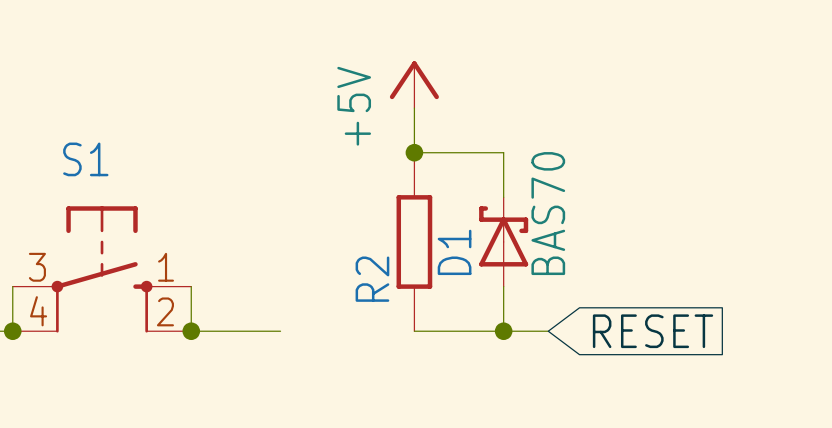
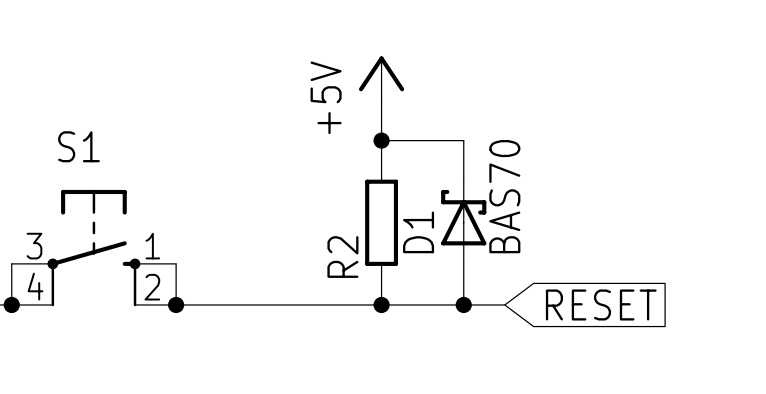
wire: none -> (258, 304) (381, 304)
junction: none -> (381, 304)

